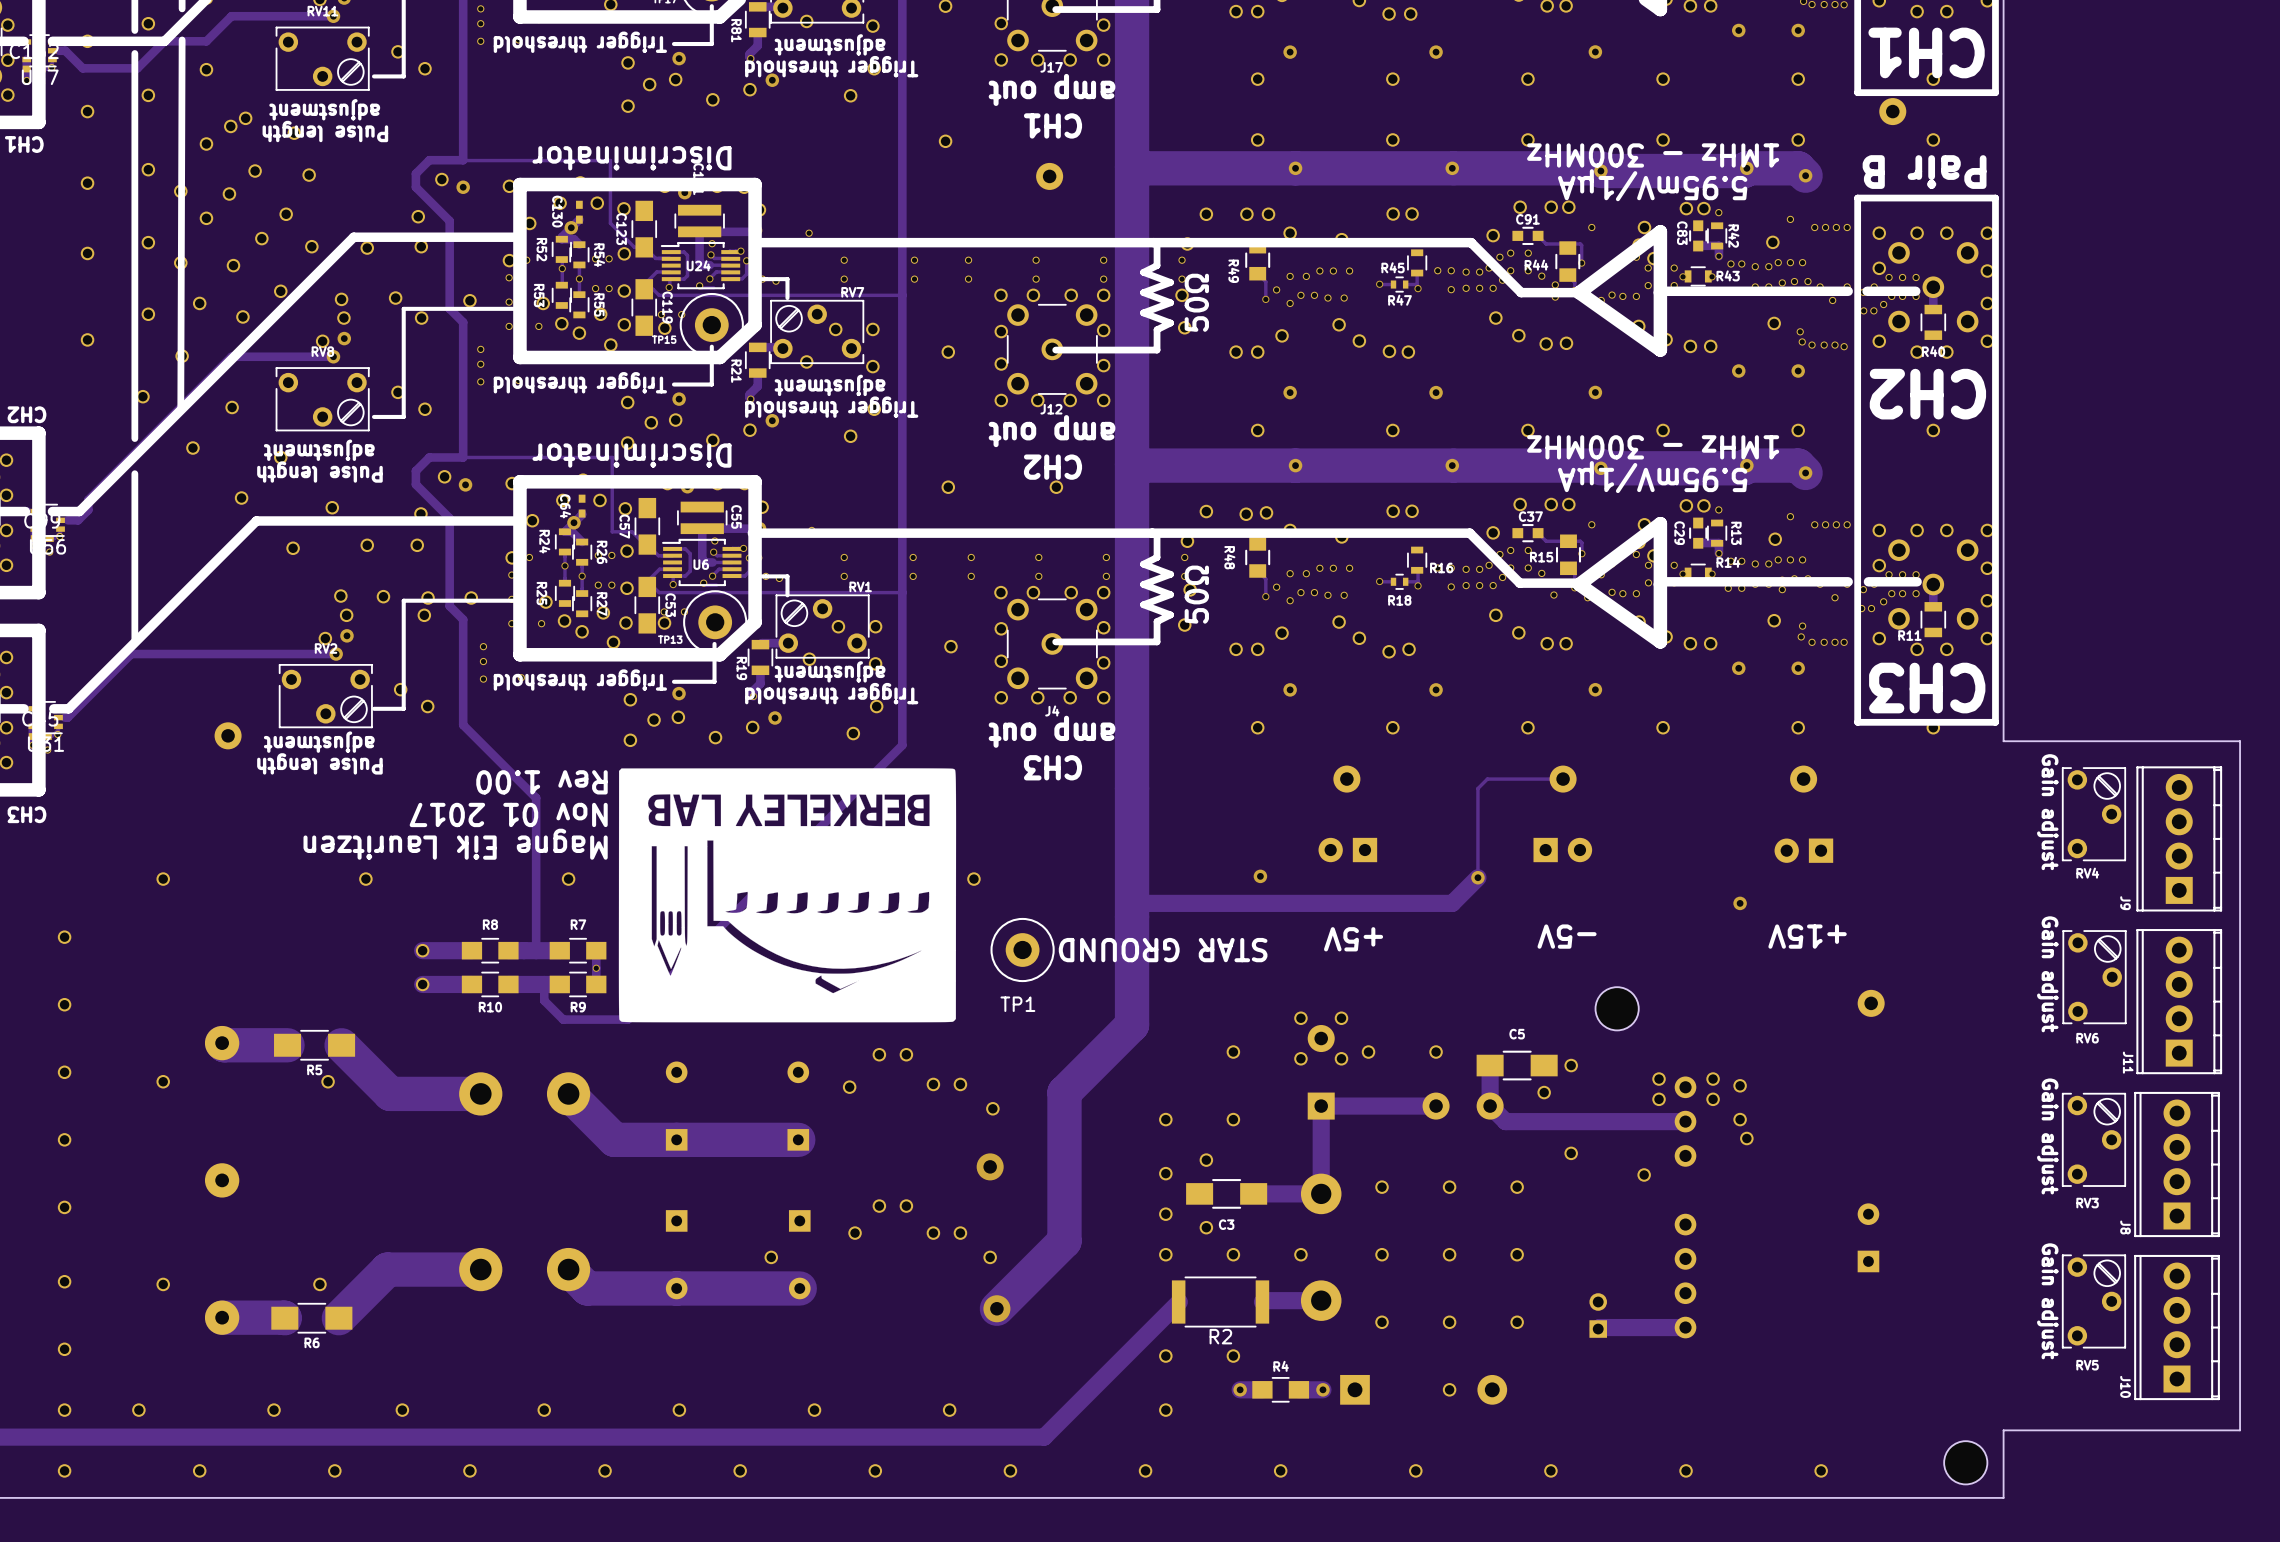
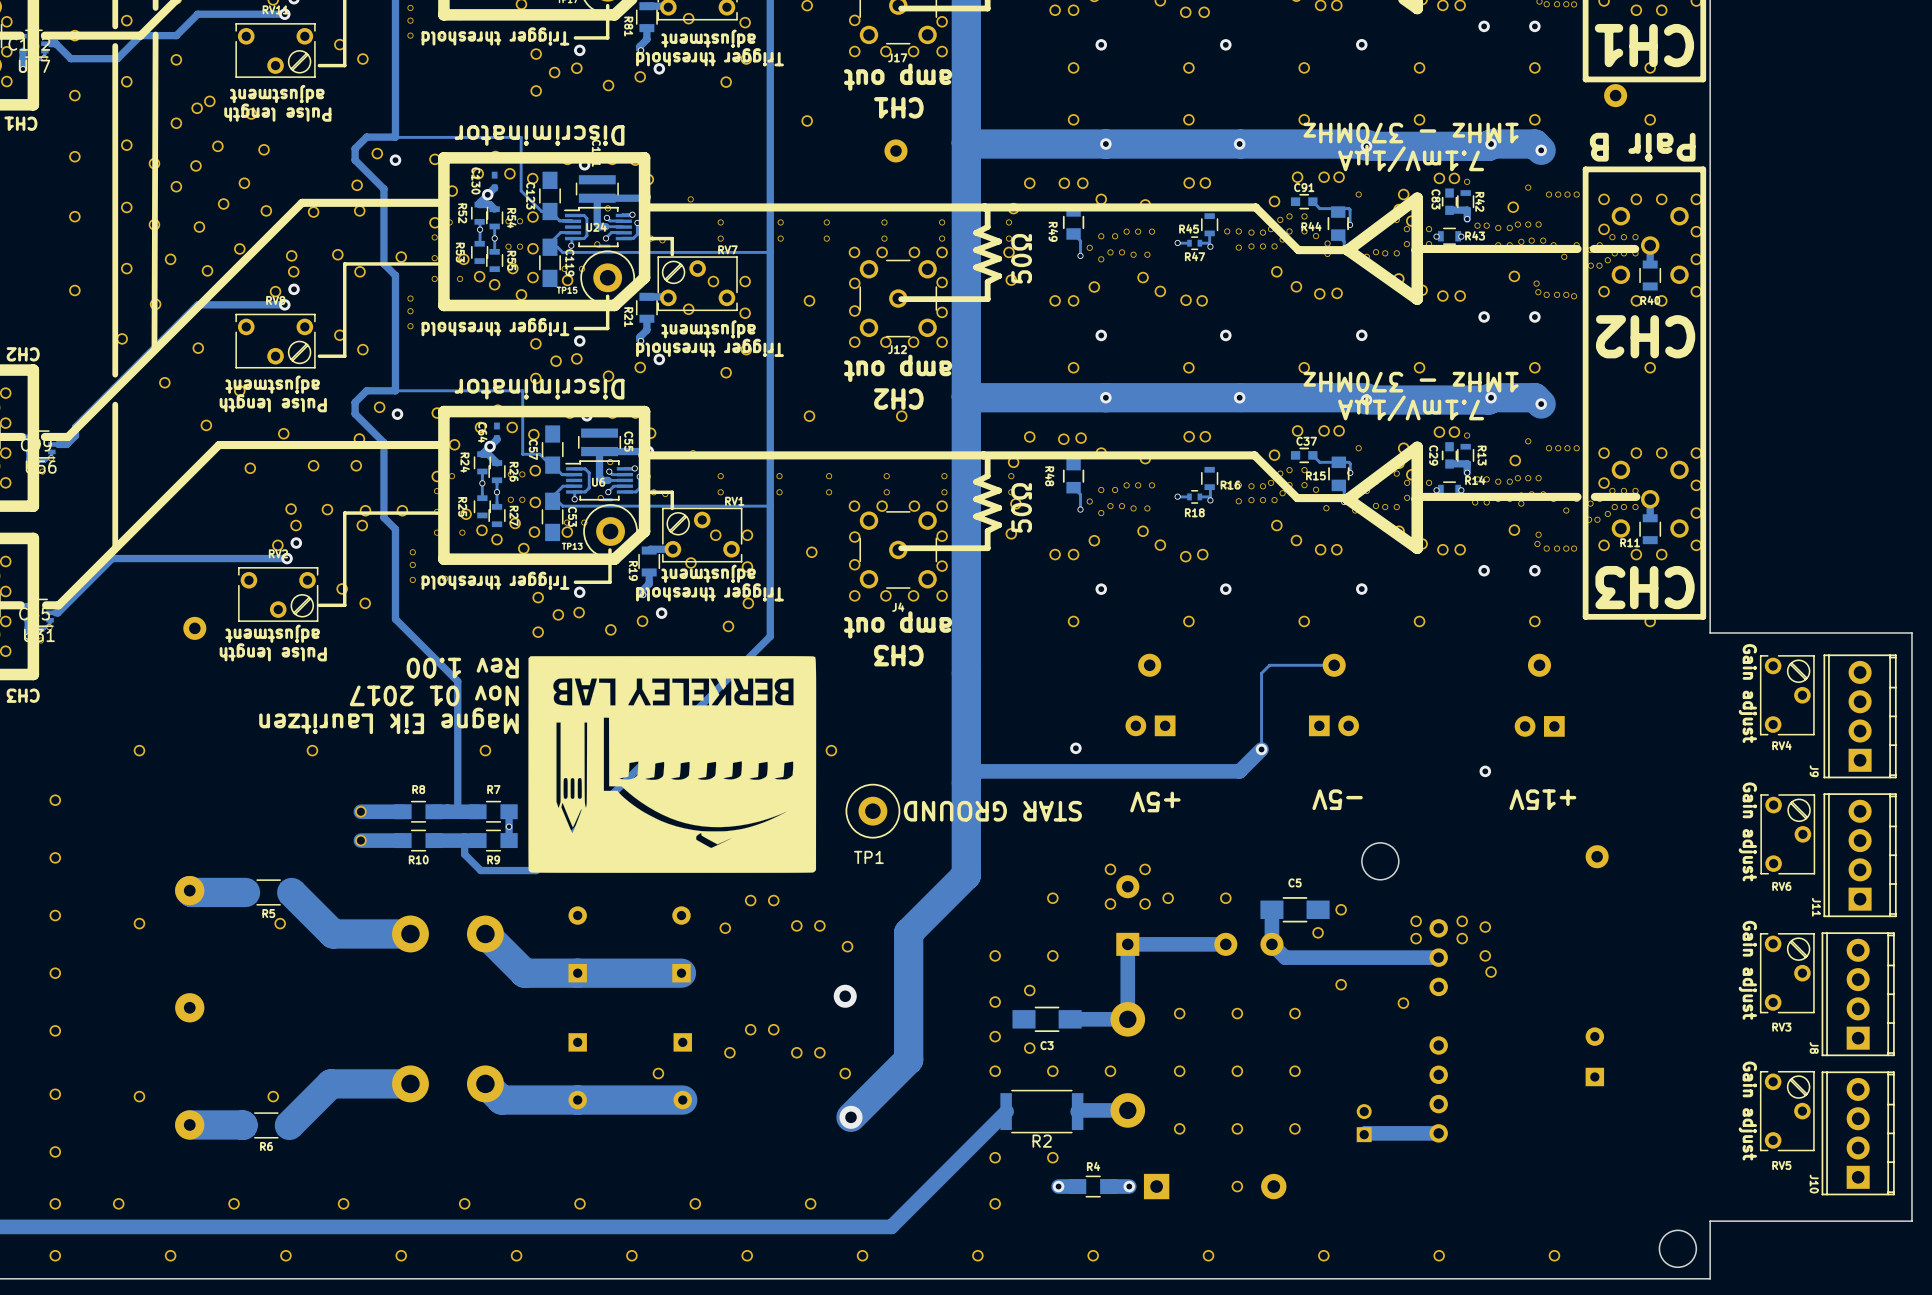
text: 1MHz - 300MHz (1653, 155) -> 1MHz - 370MHz (1411, 133)
text: 5.95mV/1µA (1652, 185) -> 7.1mV/1µA (1411, 158)
text: 1MHz - 300MHz (1653, 447) -> 1MHz - 370MHz (1411, 382)
text: 5.95mV/1µA (1652, 477) -> 7.1mV/1µA (1411, 407)

